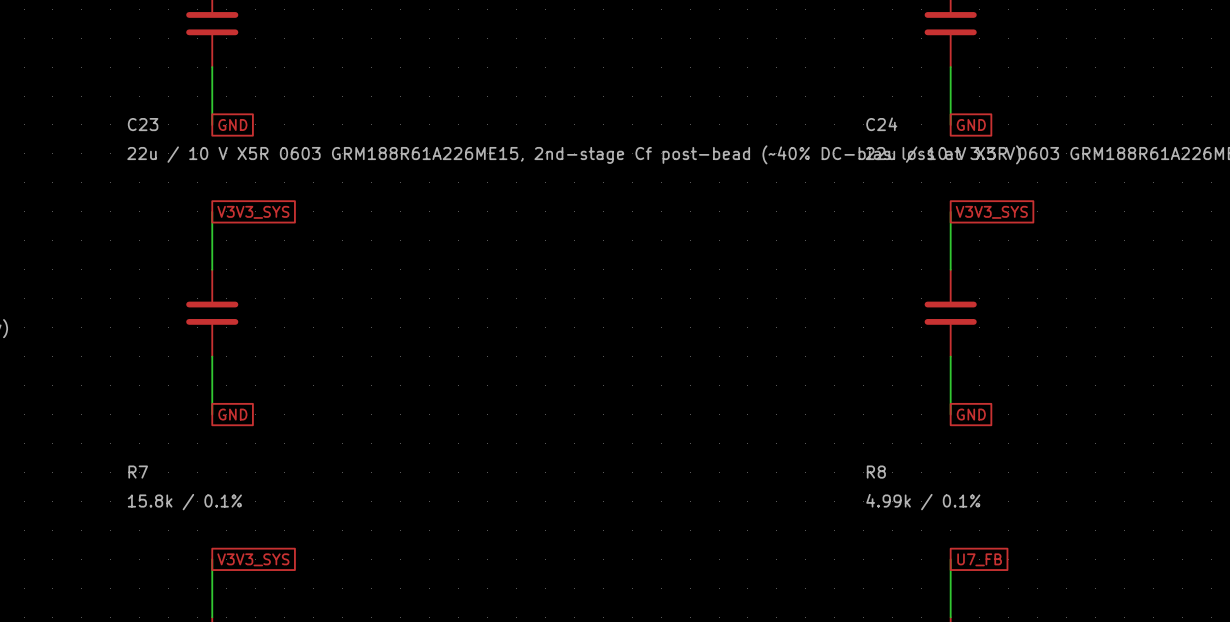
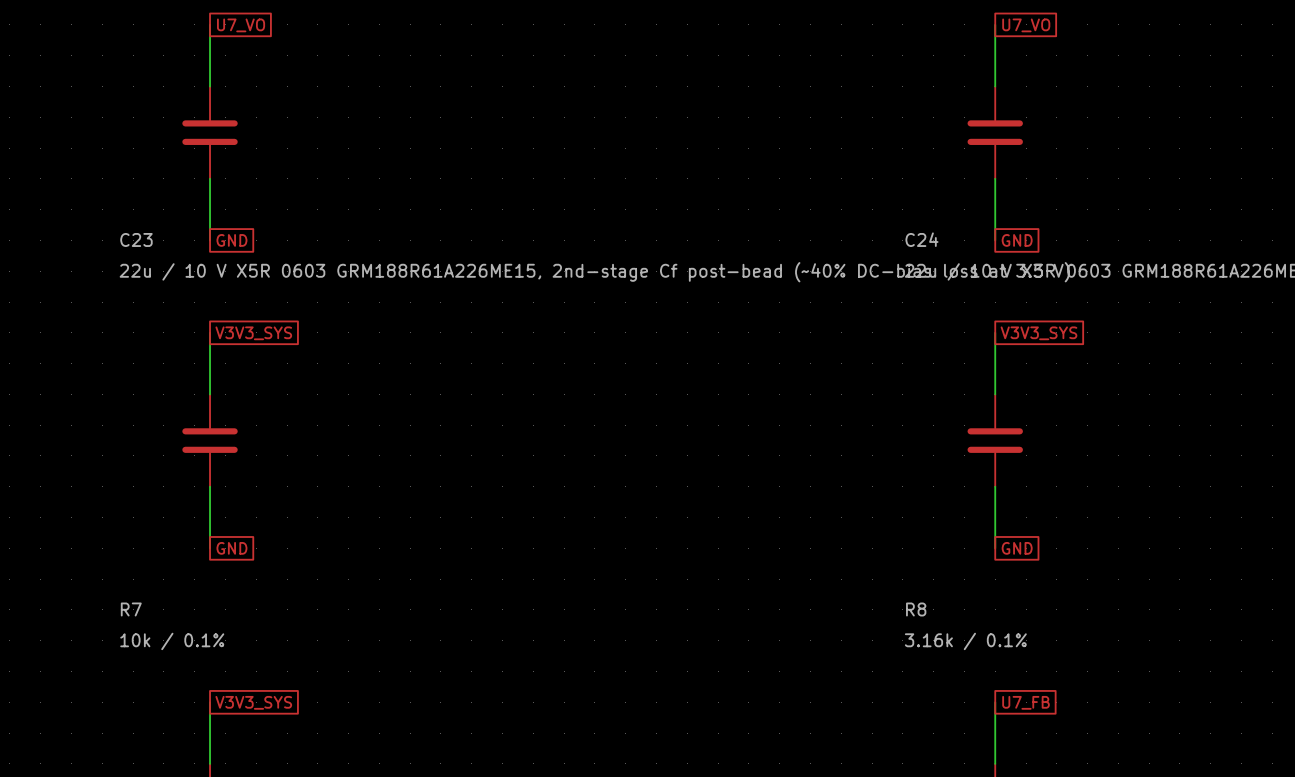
R7 value: 15.8k / 0.1% (184, 502) -> 10k / 0.1% (172, 641)
R8 value: 4.99k / 0.1% (923, 502) -> 3.16k / 0.1% (965, 641)

